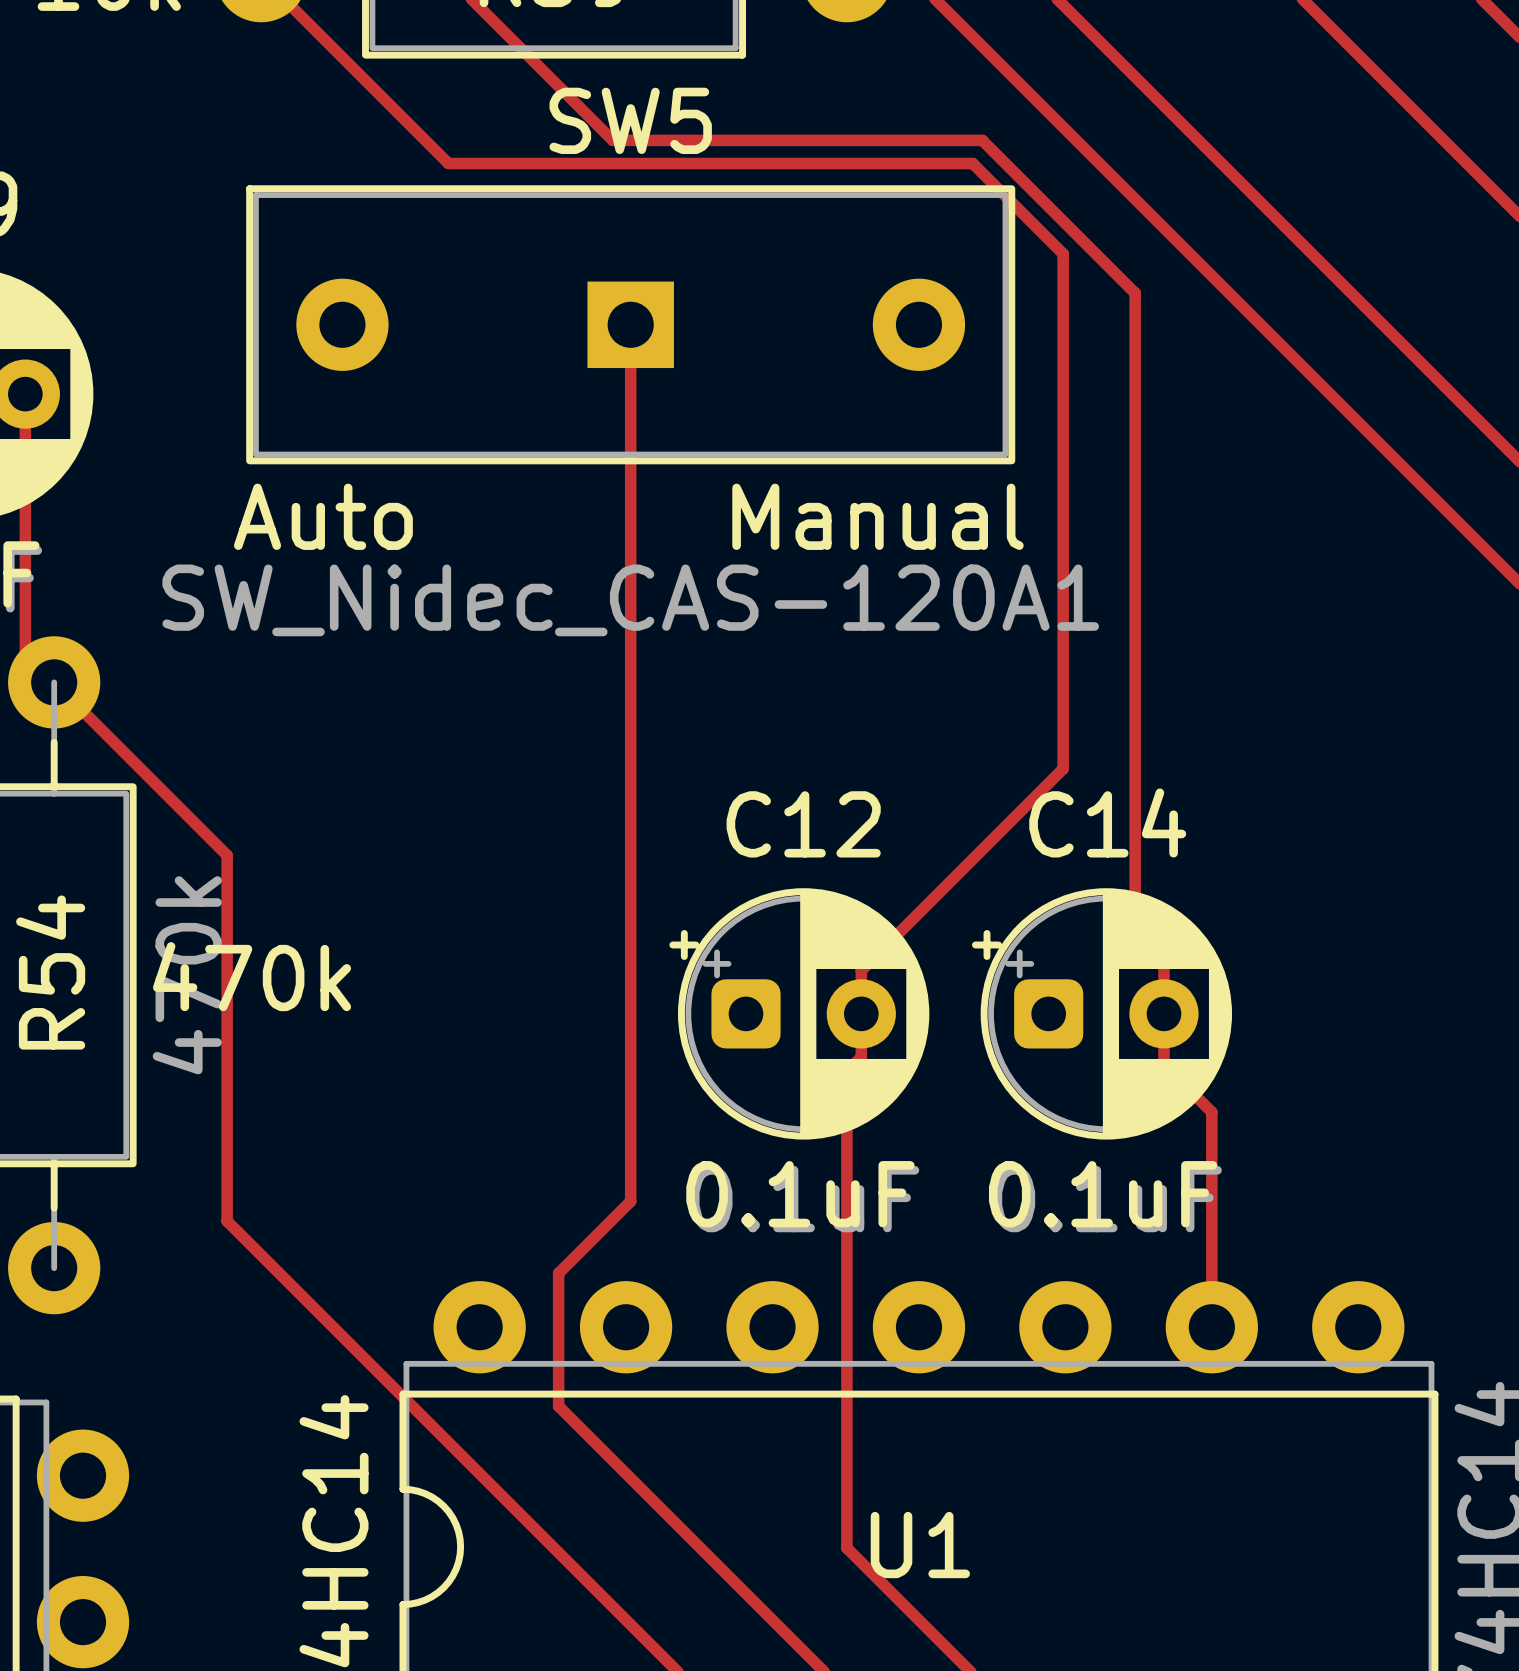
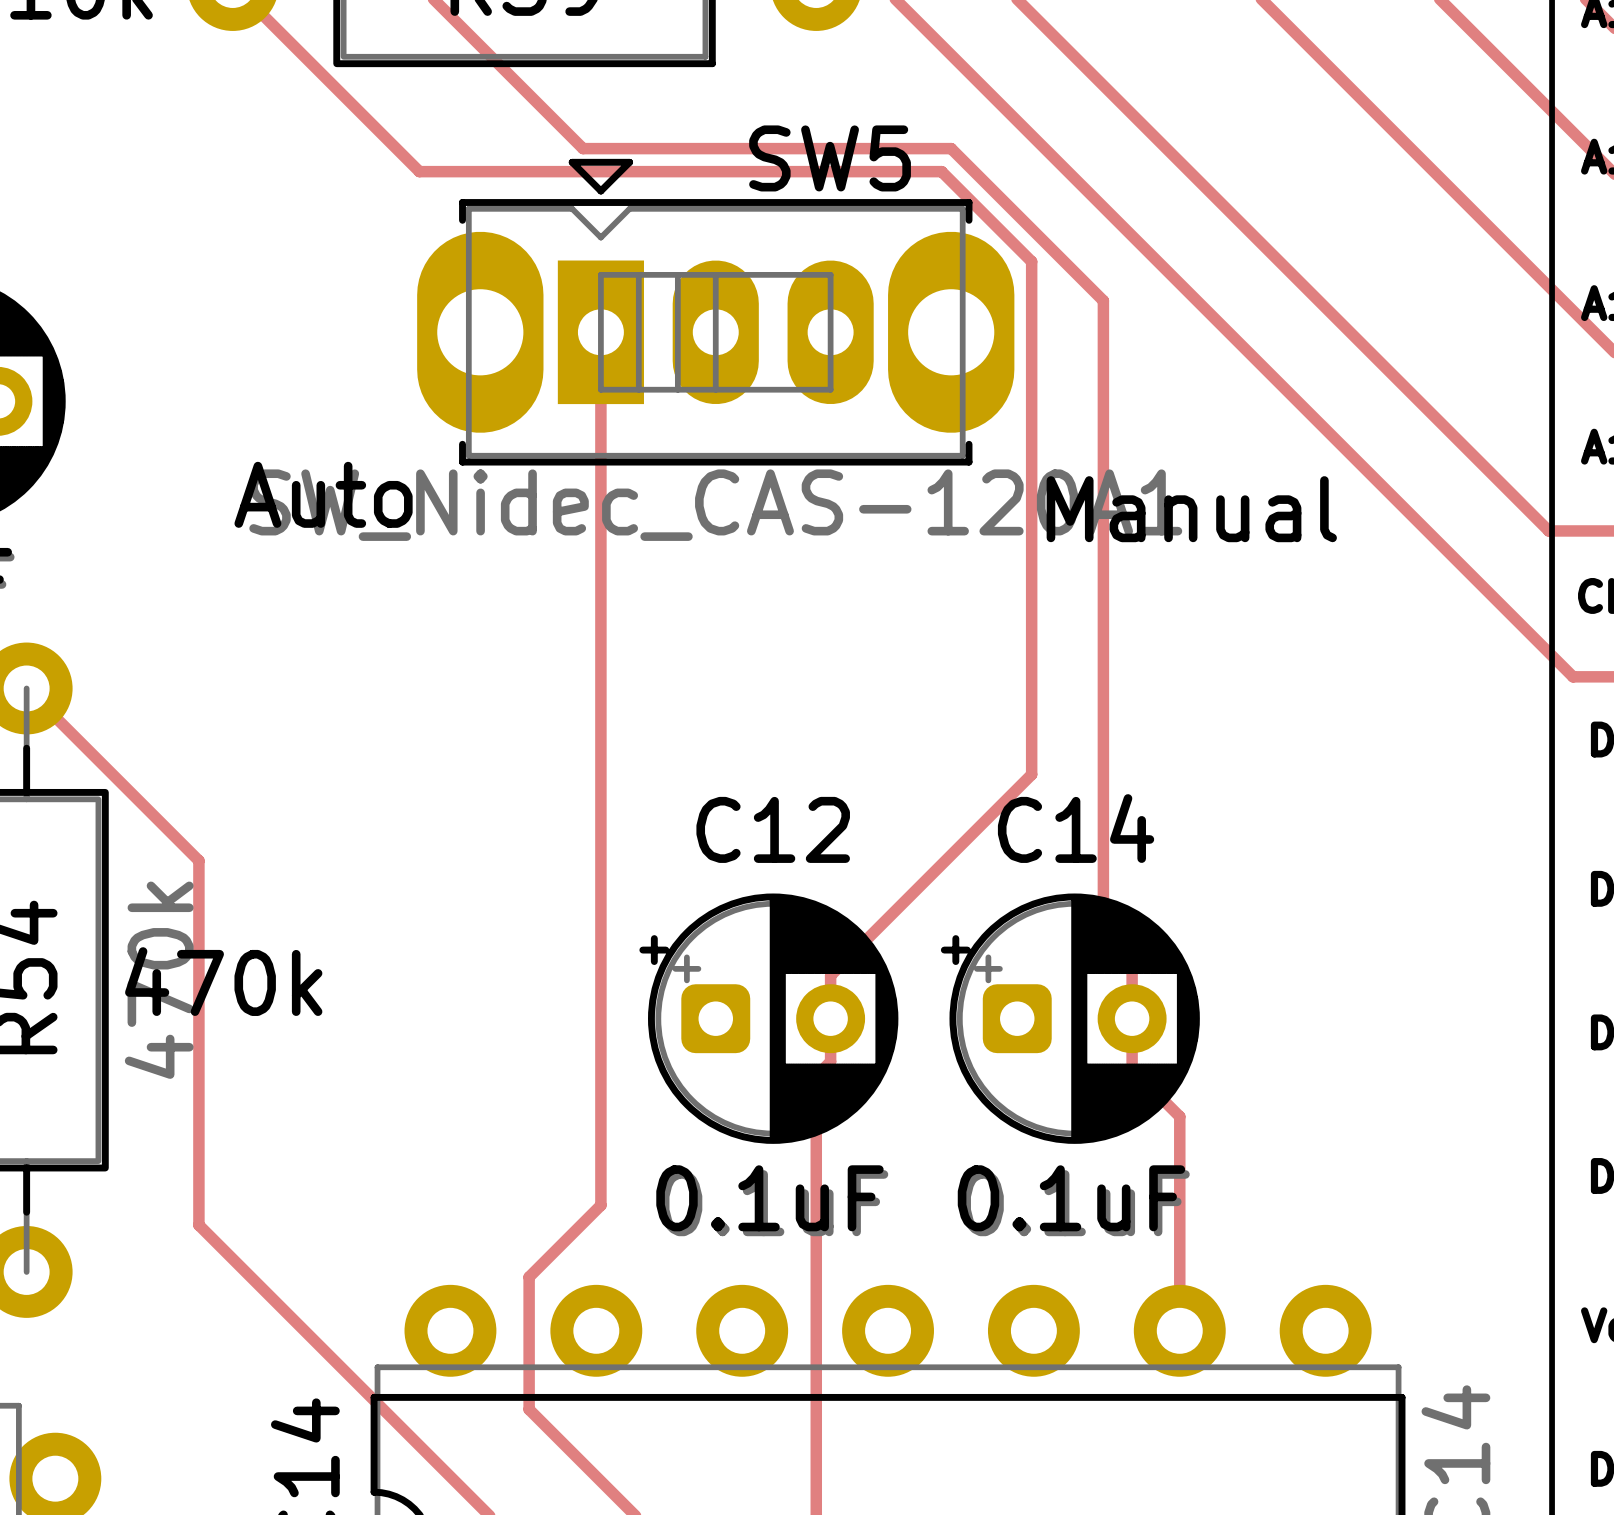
SW5 name position: SW5 (630, 120) -> SW5 (830, 158)
SW5 footprint: [246, 185, 1016, 465] -> [417, 158, 1015, 466]
text position: Auto (323, 516) -> Auto (323, 494)
text position: Manual (877, 516) -> Manual (1191, 509)

